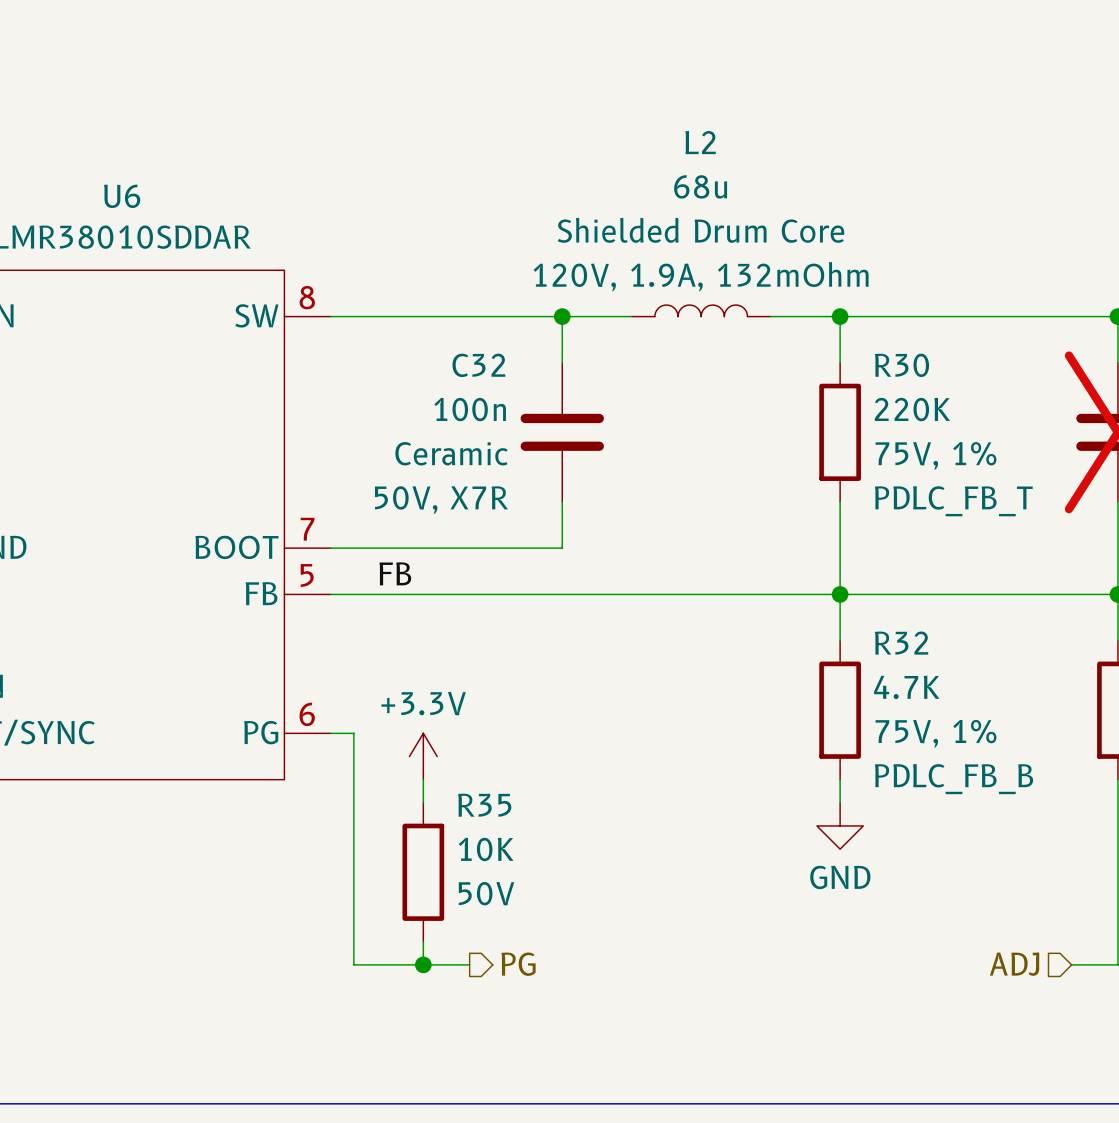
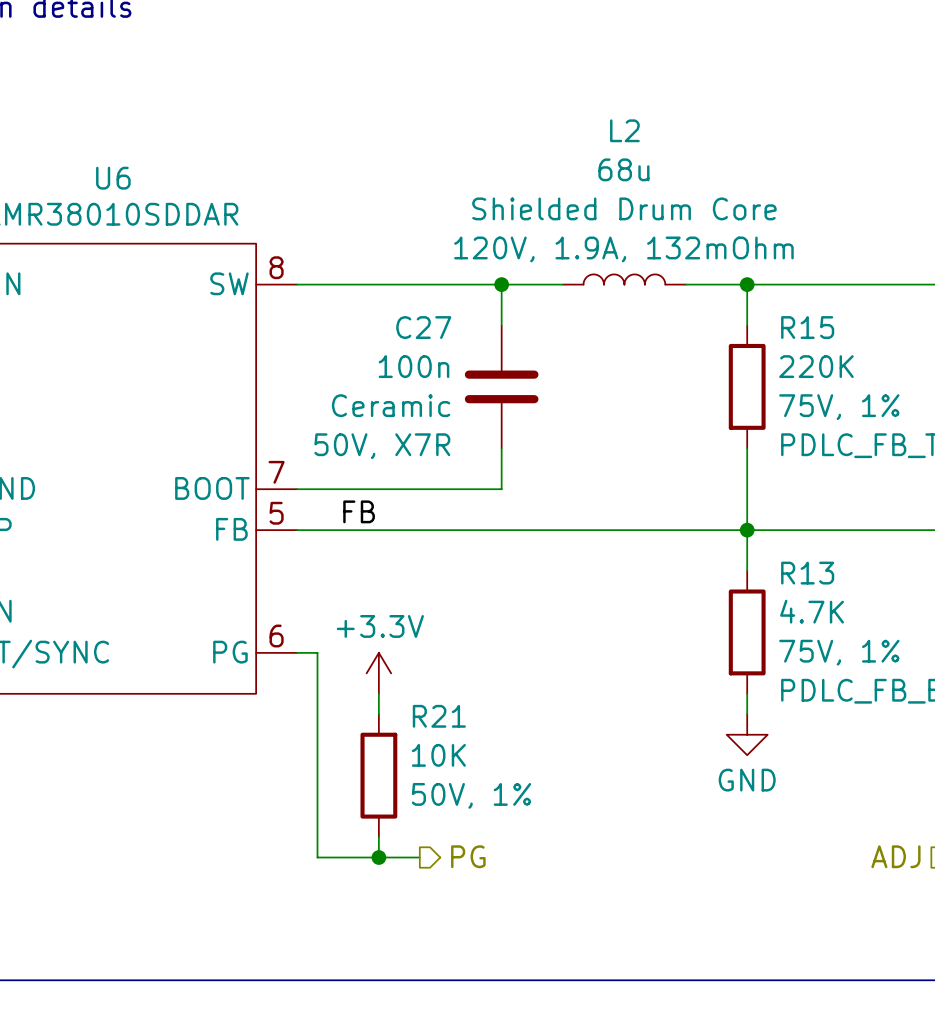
C32 name: C32 (478, 365) -> C27 (423, 327)
R30 name: R30 (901, 365) -> R15 (807, 327)
R32 name: R32 (901, 643) -> R13 (807, 573)
R35 name: R35 (484, 805) -> R21 (439, 716)
R35 text: 50V (486, 893) -> 50V, 1% (471, 795)

